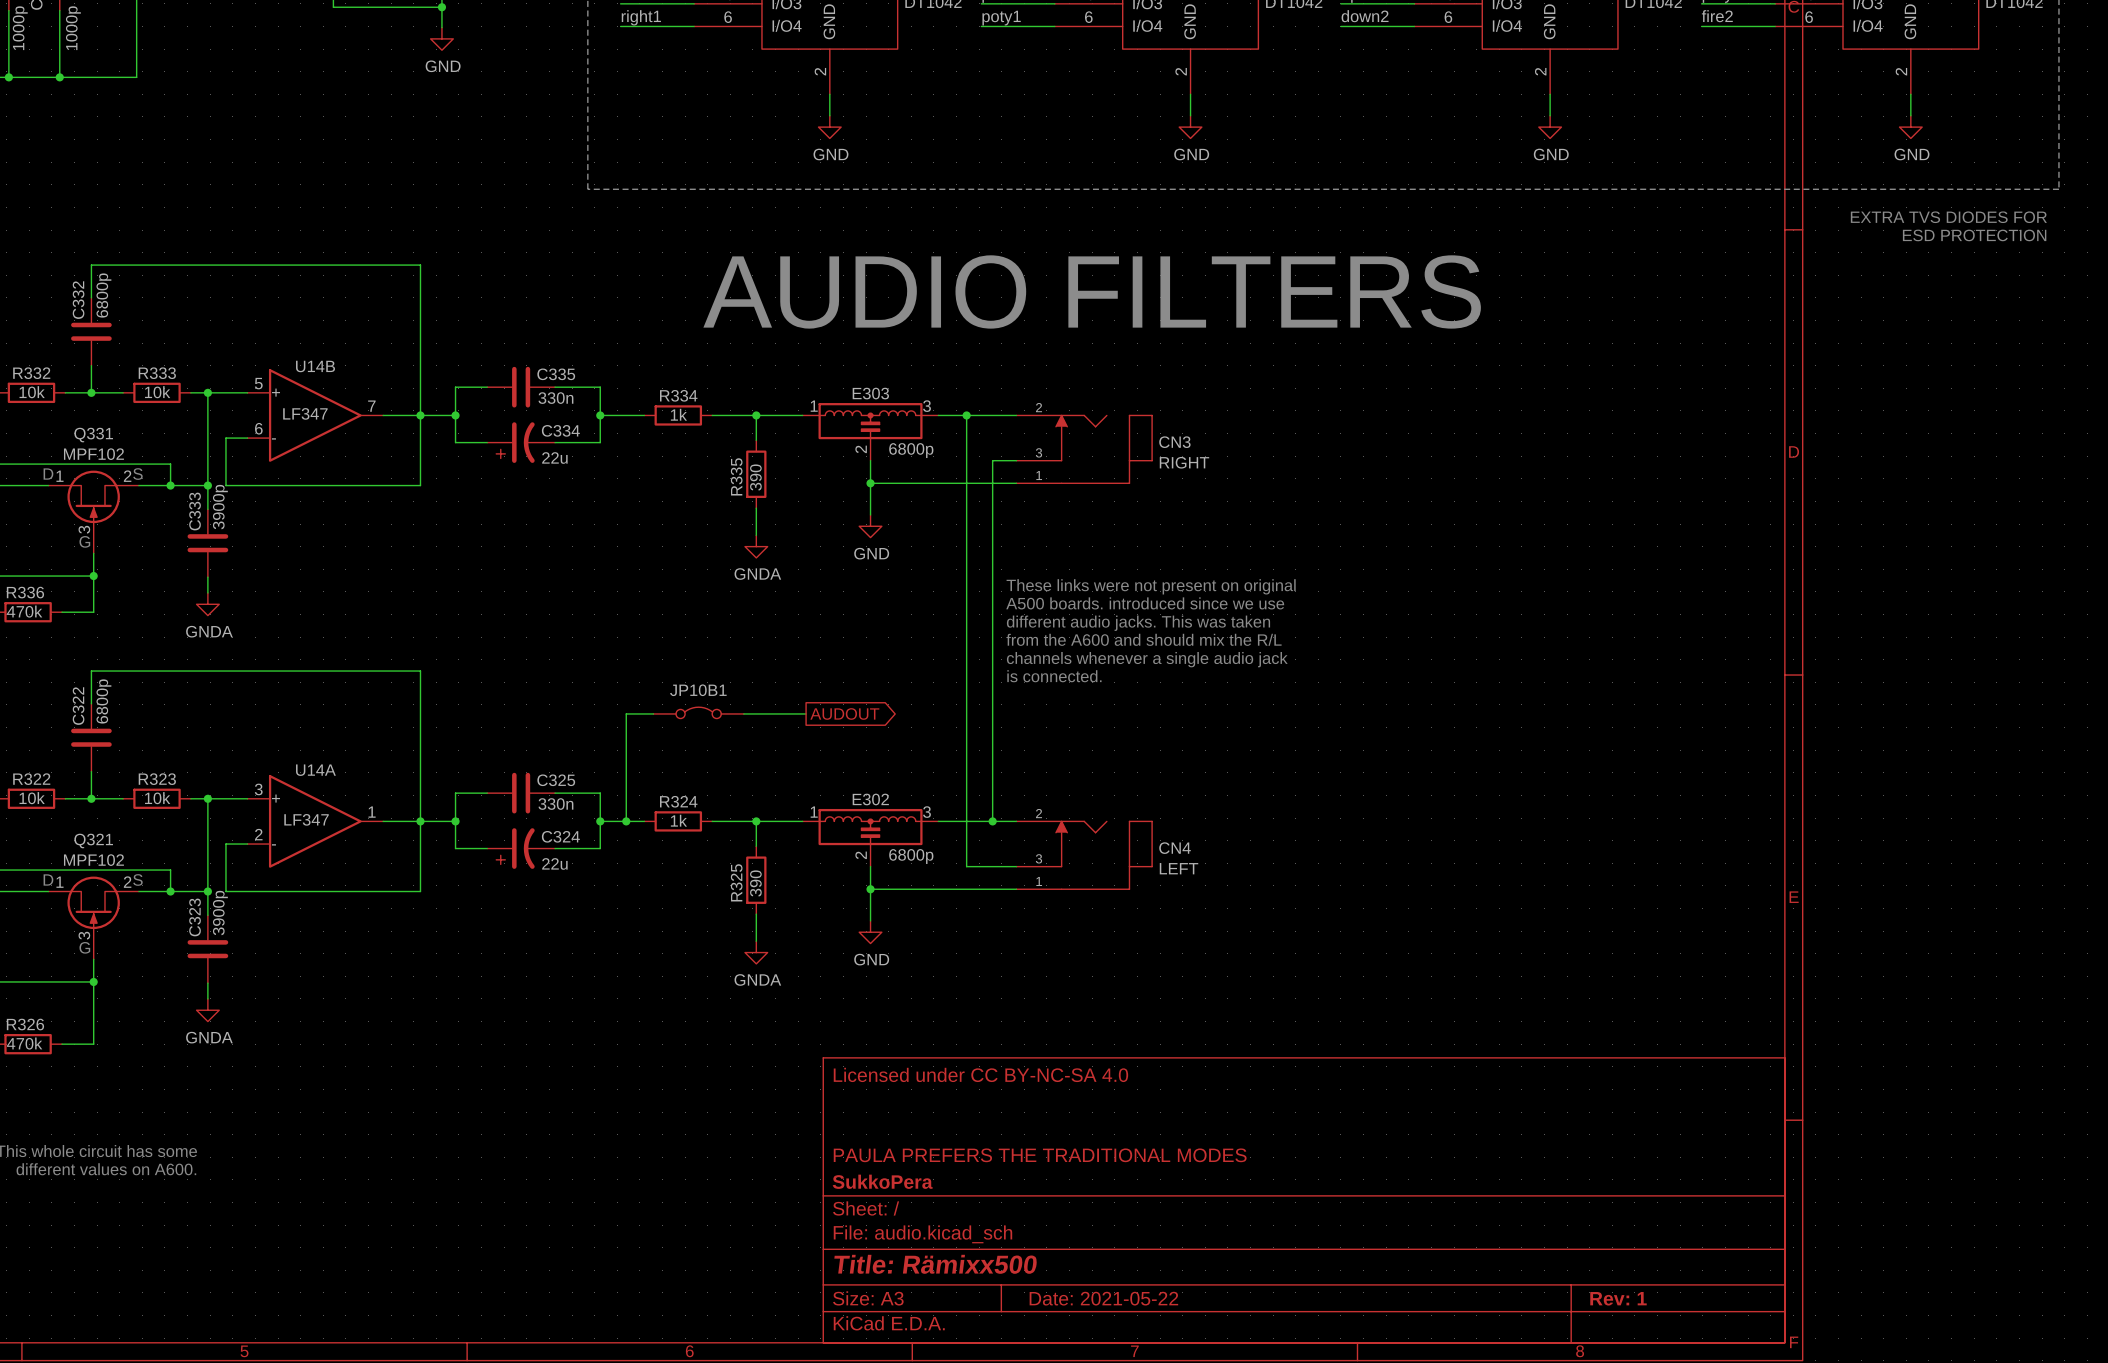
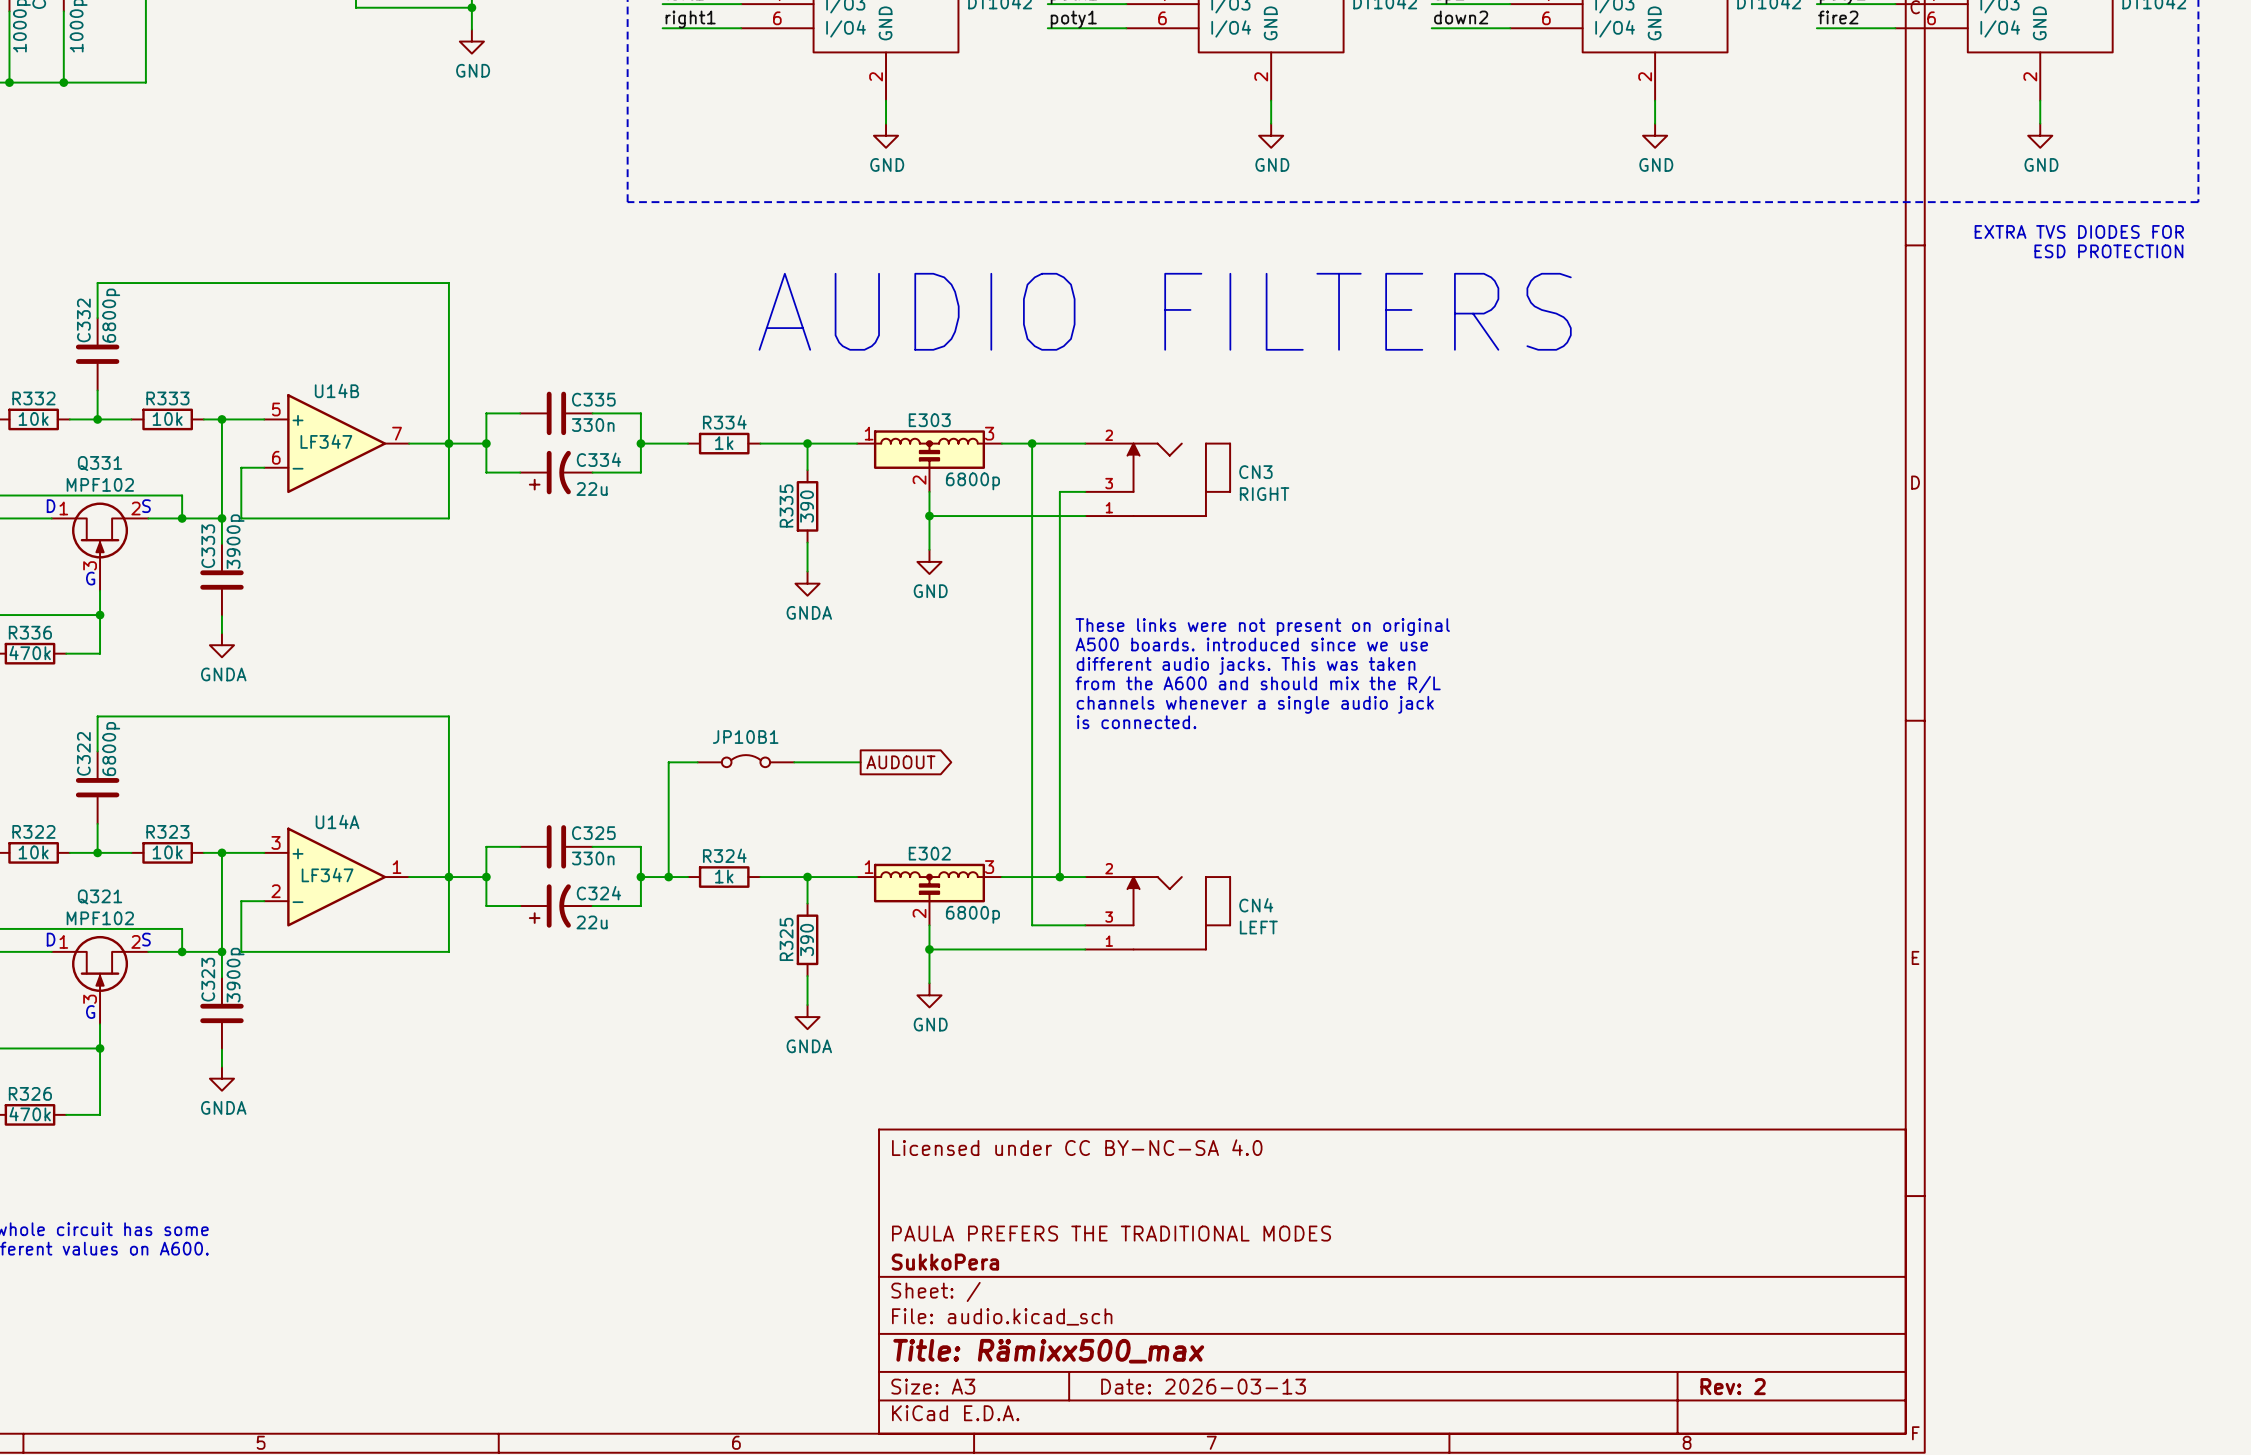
title block: Title: Rämixx500 (935, 1264) -> Title: Rämixx500_max (1048, 1351)
title block: Date: 2021-05-22 (1103, 1298) -> Date: 2026-03-13 (1203, 1386)
title block: Rev: 1 (1618, 1298) -> Rev: 2 (1733, 1386)

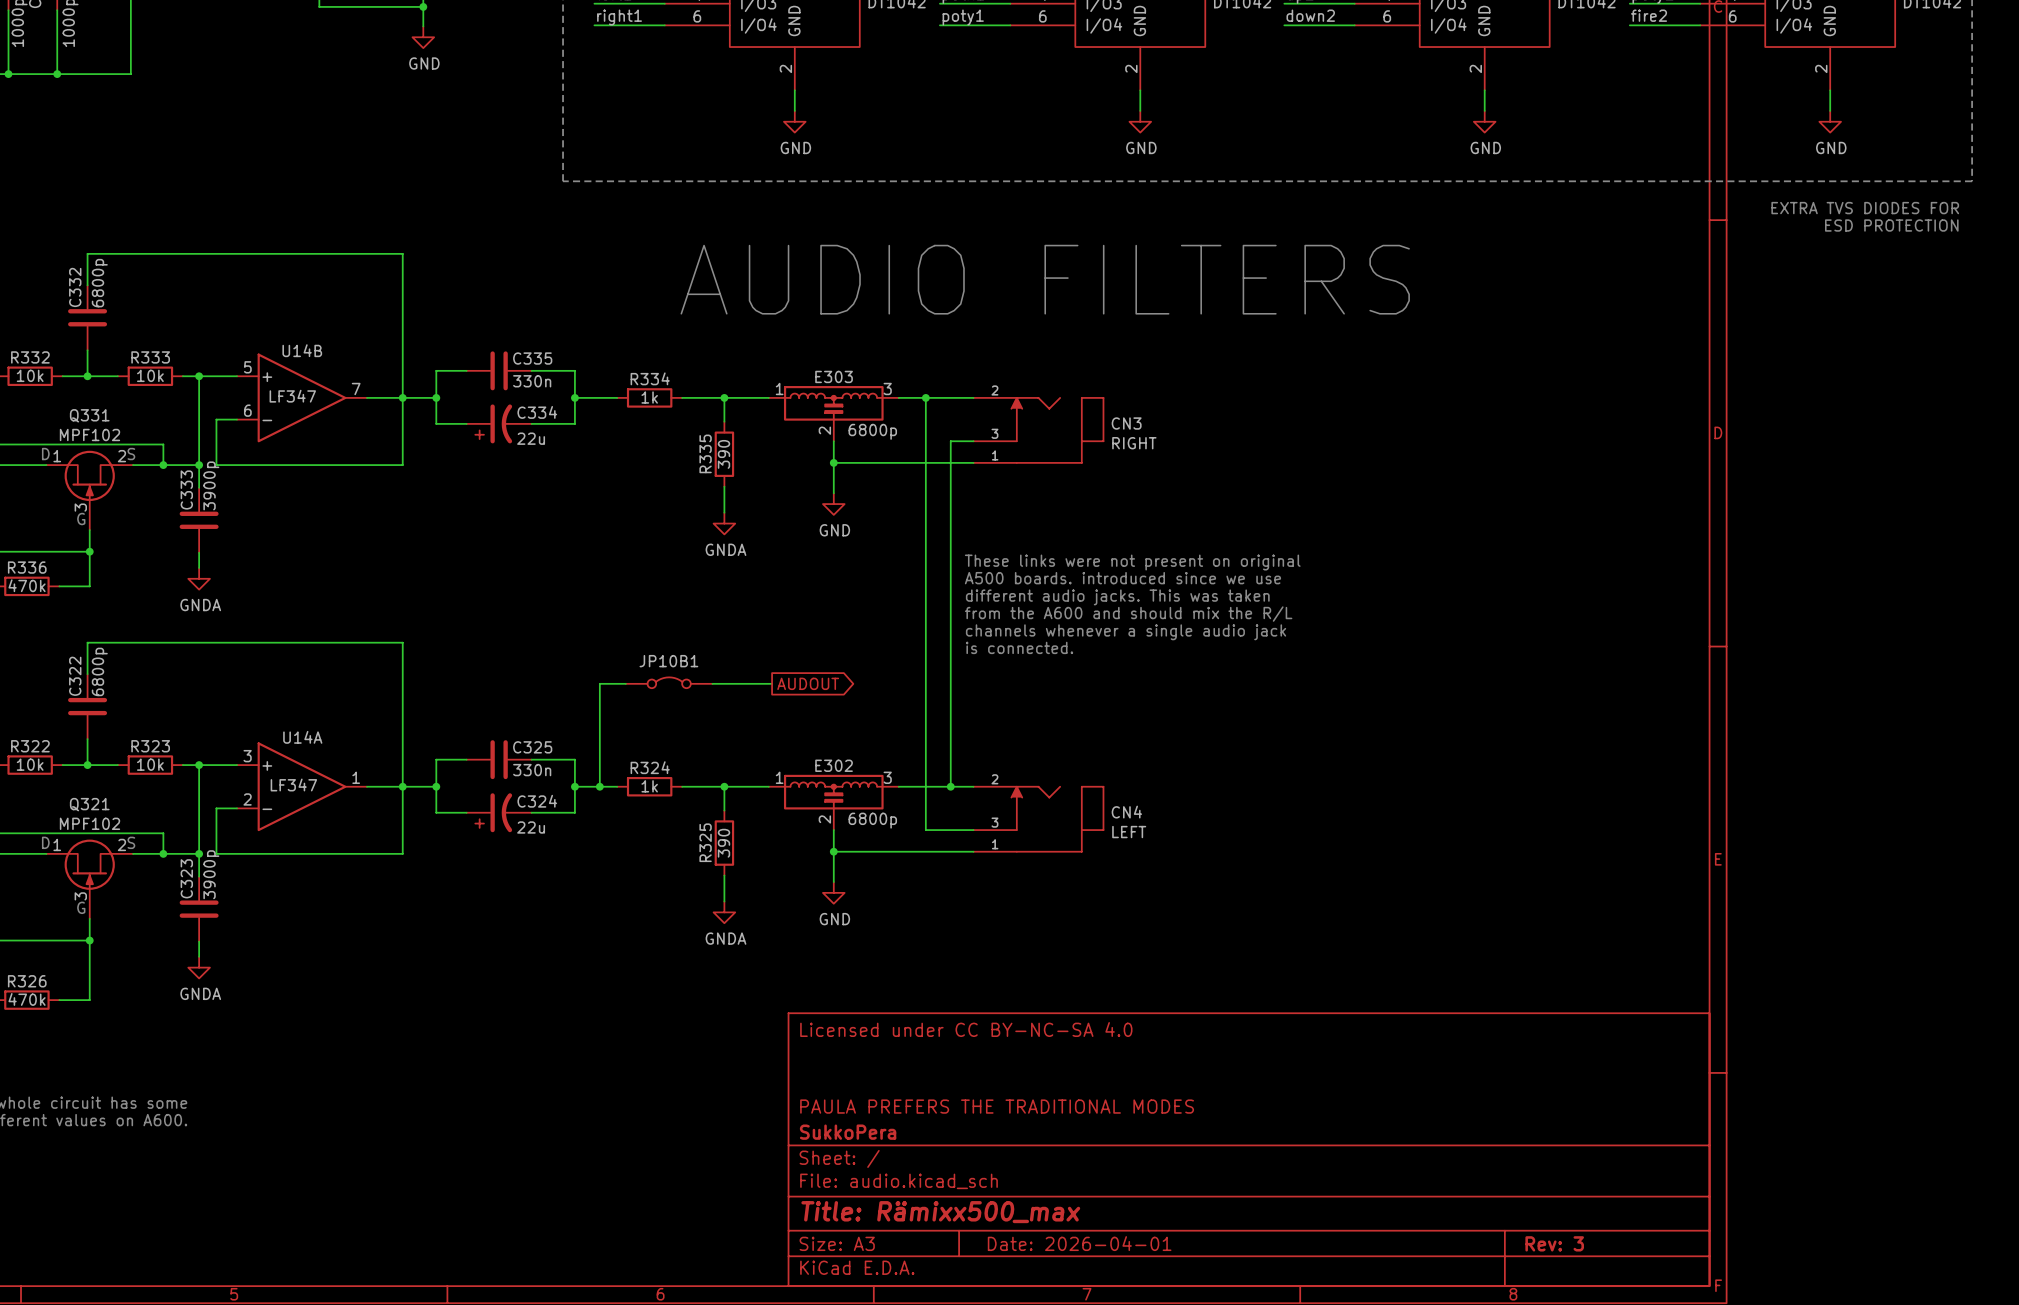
title block: Date: 2026-03-13 (1203, 1386) -> Date: 2026-04-01 (1079, 1243)
title block: Rev: 2 (1733, 1386) -> Rev: 3 (1554, 1243)

